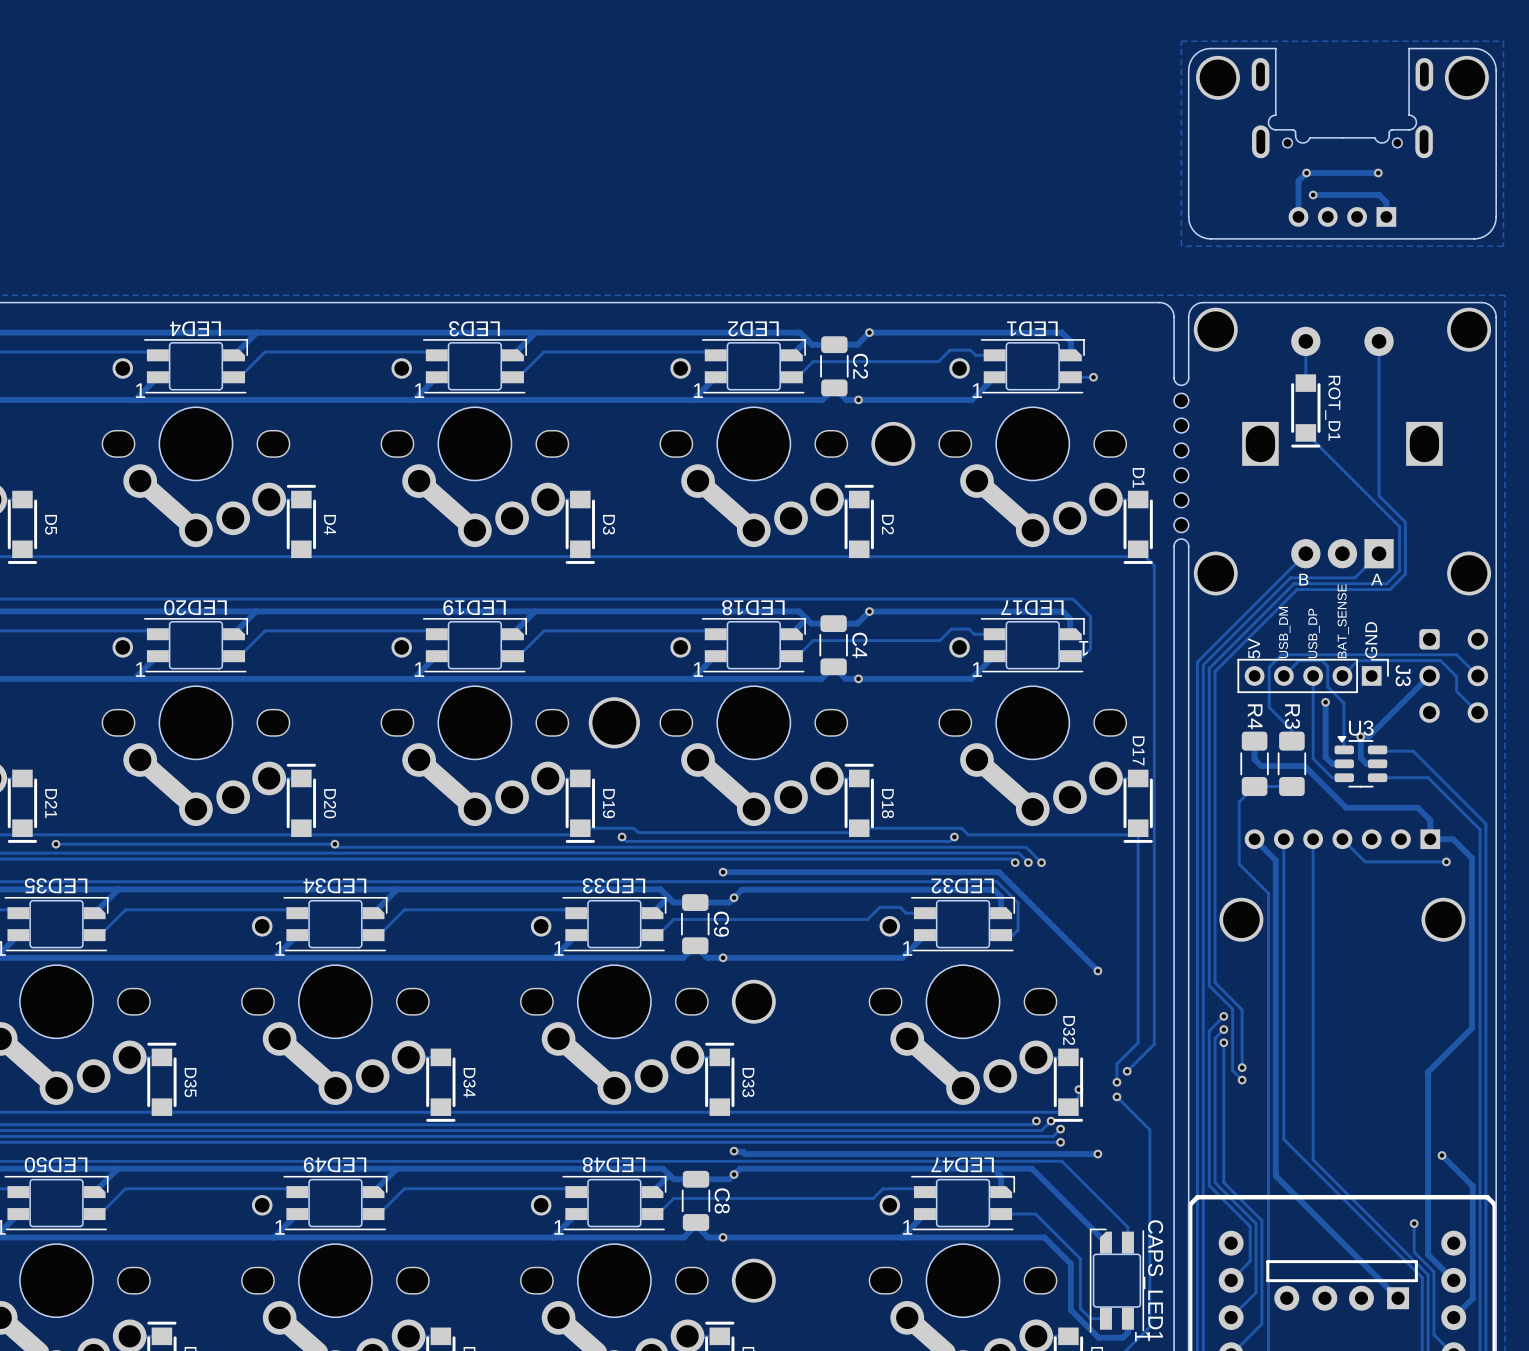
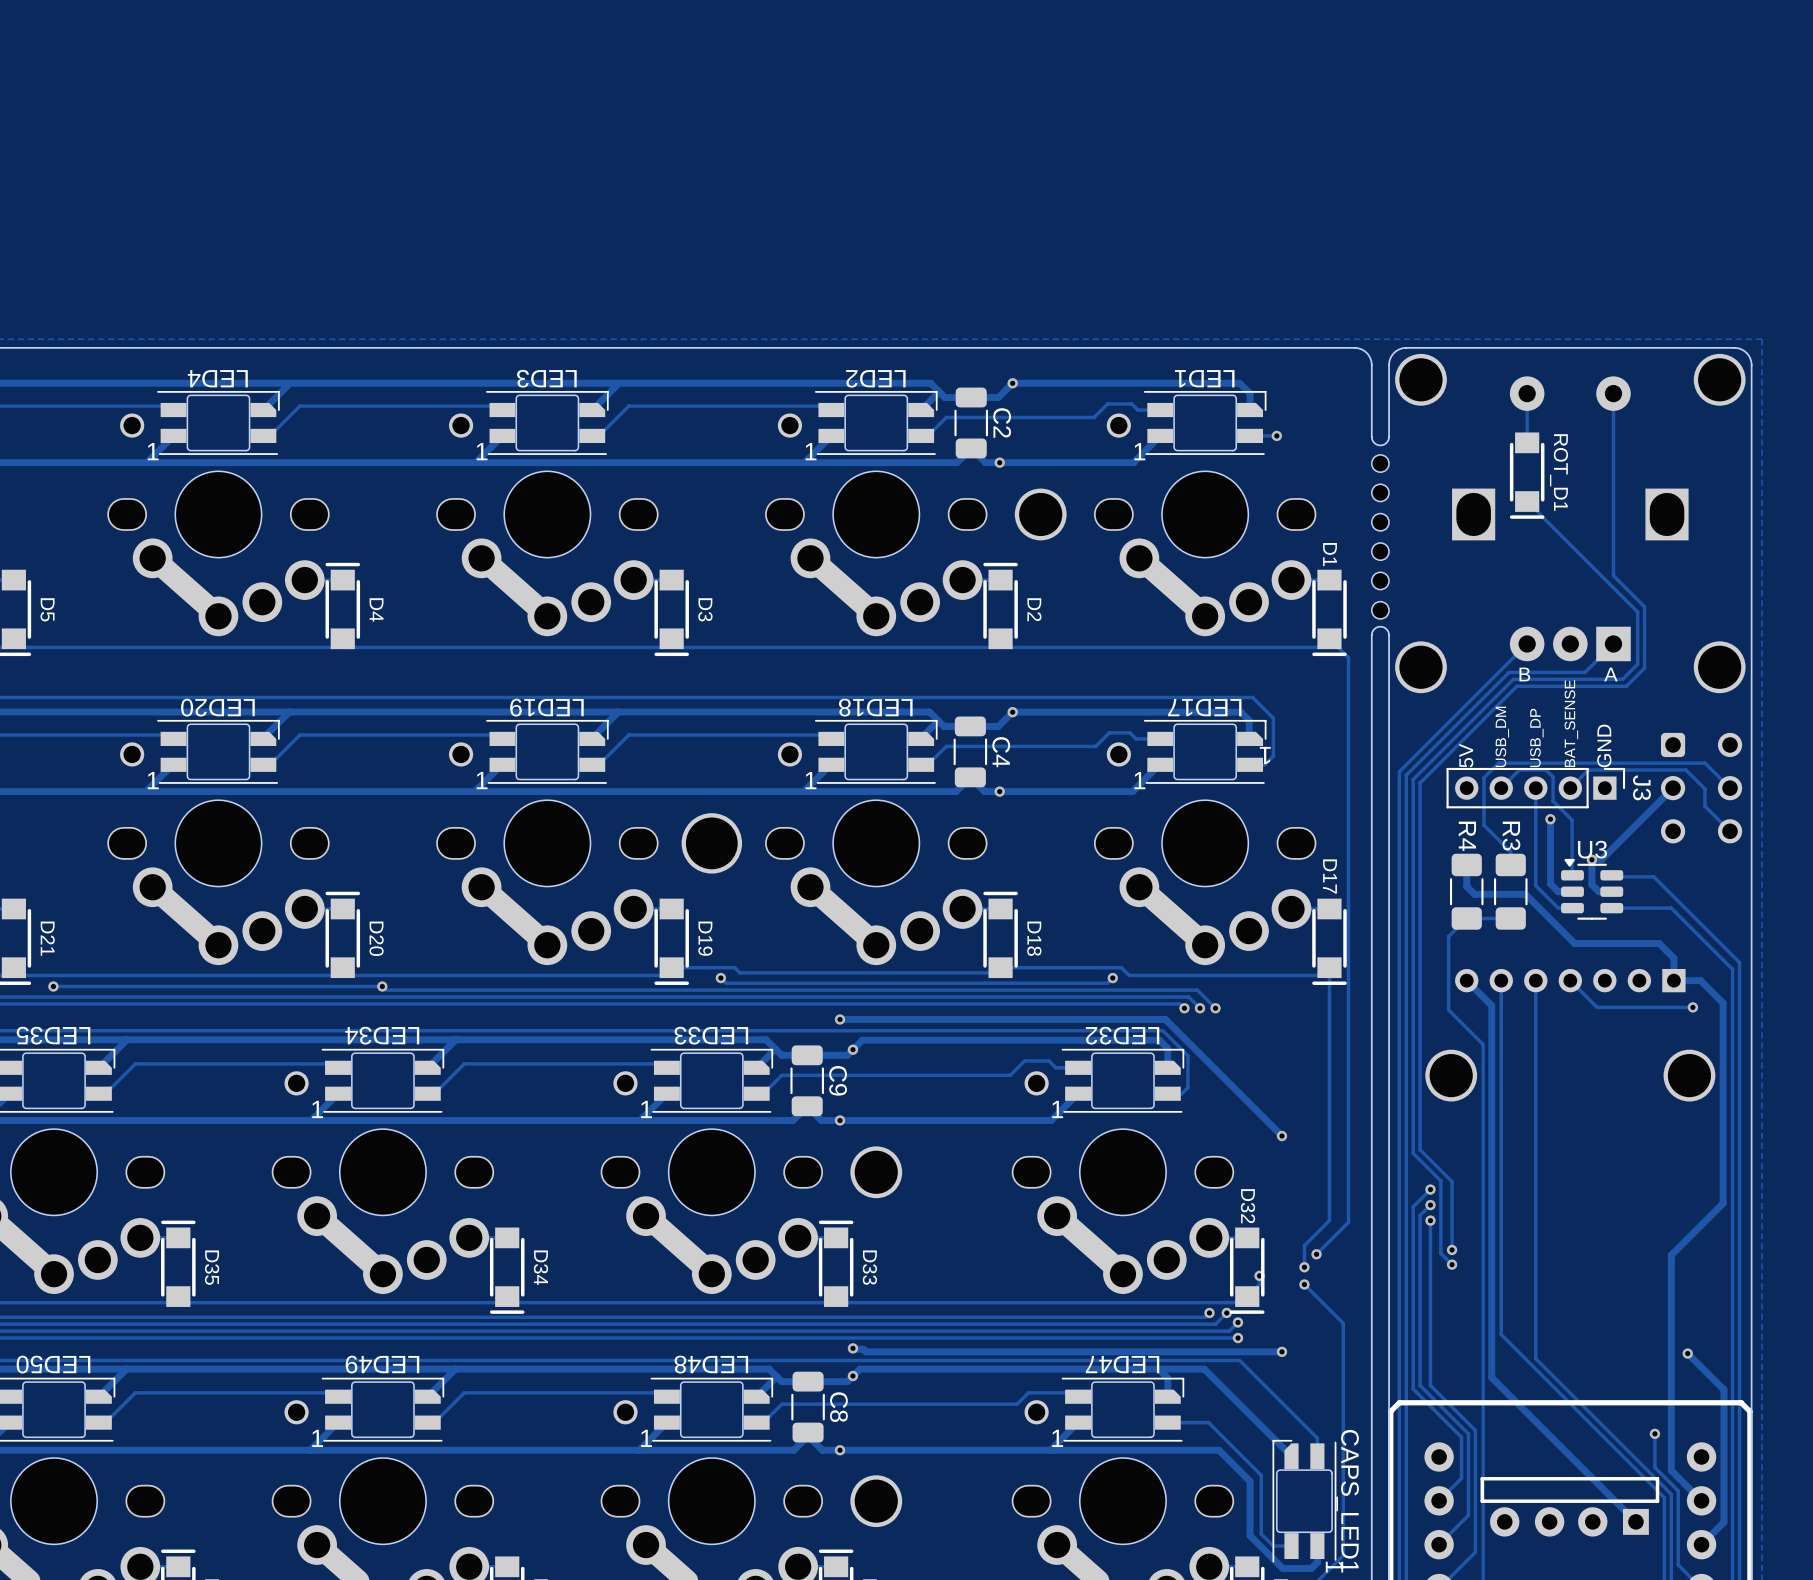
zone outline: (1503, 41) (1181, 41) (1181, 246) (1503, 246) (1503, 41) -> none
board edge: (1409, 48) (1477, 48) (1487, 53) (1494, 62) (1496, 70) (1496, 216) (1494, 225) (1489, 232) (1482, 237) (1474, 238) (1210, 238) (1202, 237) (1193, 230) (1188, 219) (1188, 70) (1190, 62) (1197, 53) (1207, 48) (1275, 48) -> none
part: (1217, 77) -> none
part: (1466, 77) -> none
part: (1342, 103) -> none
via: (1306, 173) -> none
track: (1378, 173) (1306, 173) (1298, 181) (1298, 216) -> none
via: (1378, 173) -> none
track: (1313, 194) (1379, 194) (1386, 202) (1386, 216) -> none
via: (1313, 194) -> none
part: (1342, 216) -> none

